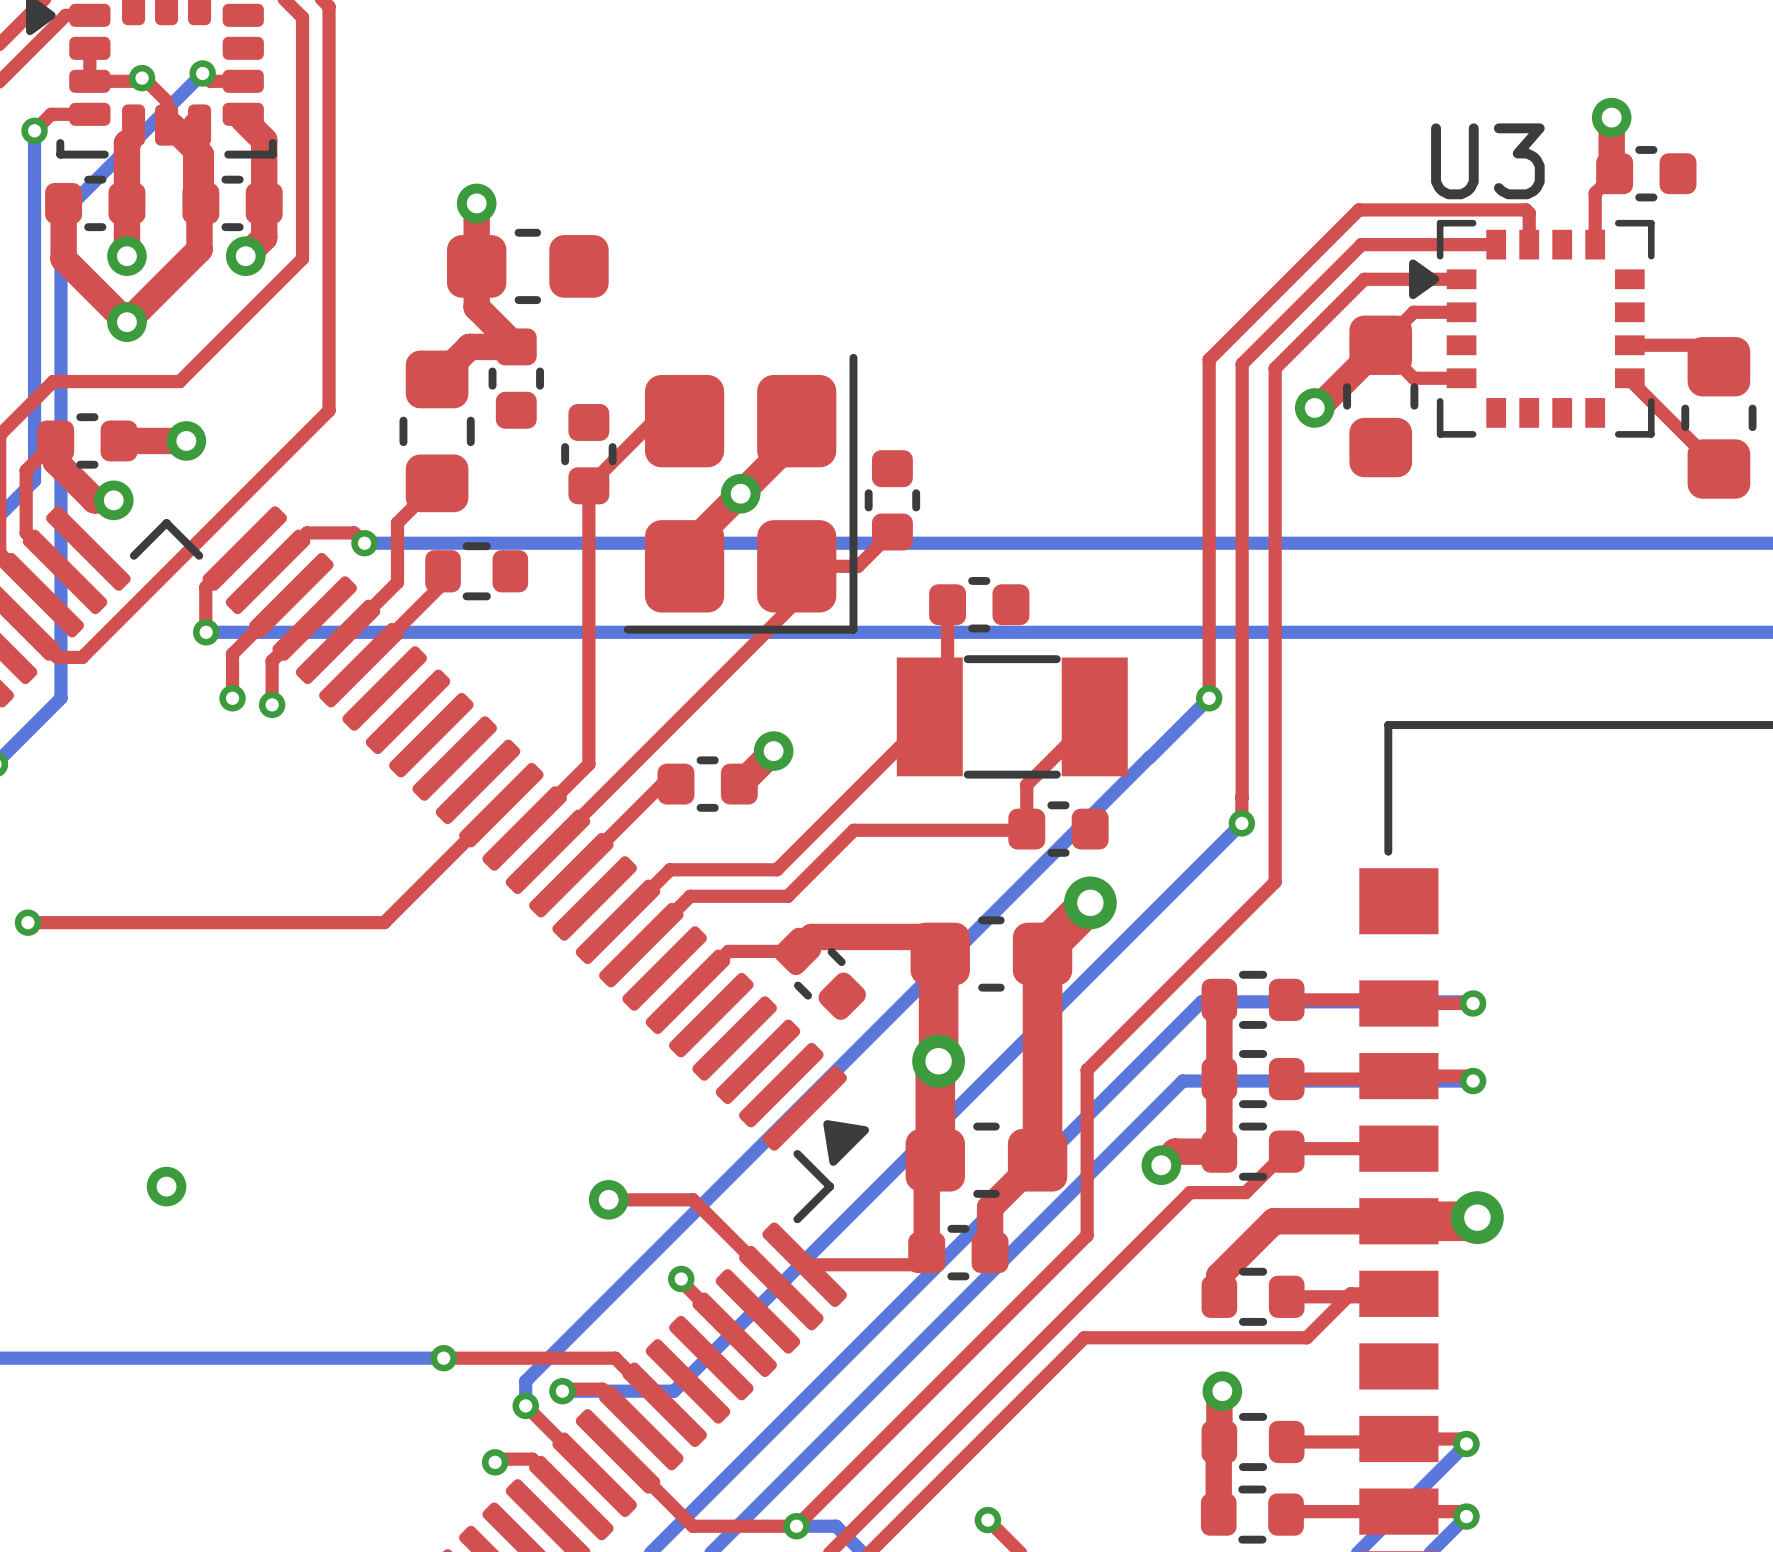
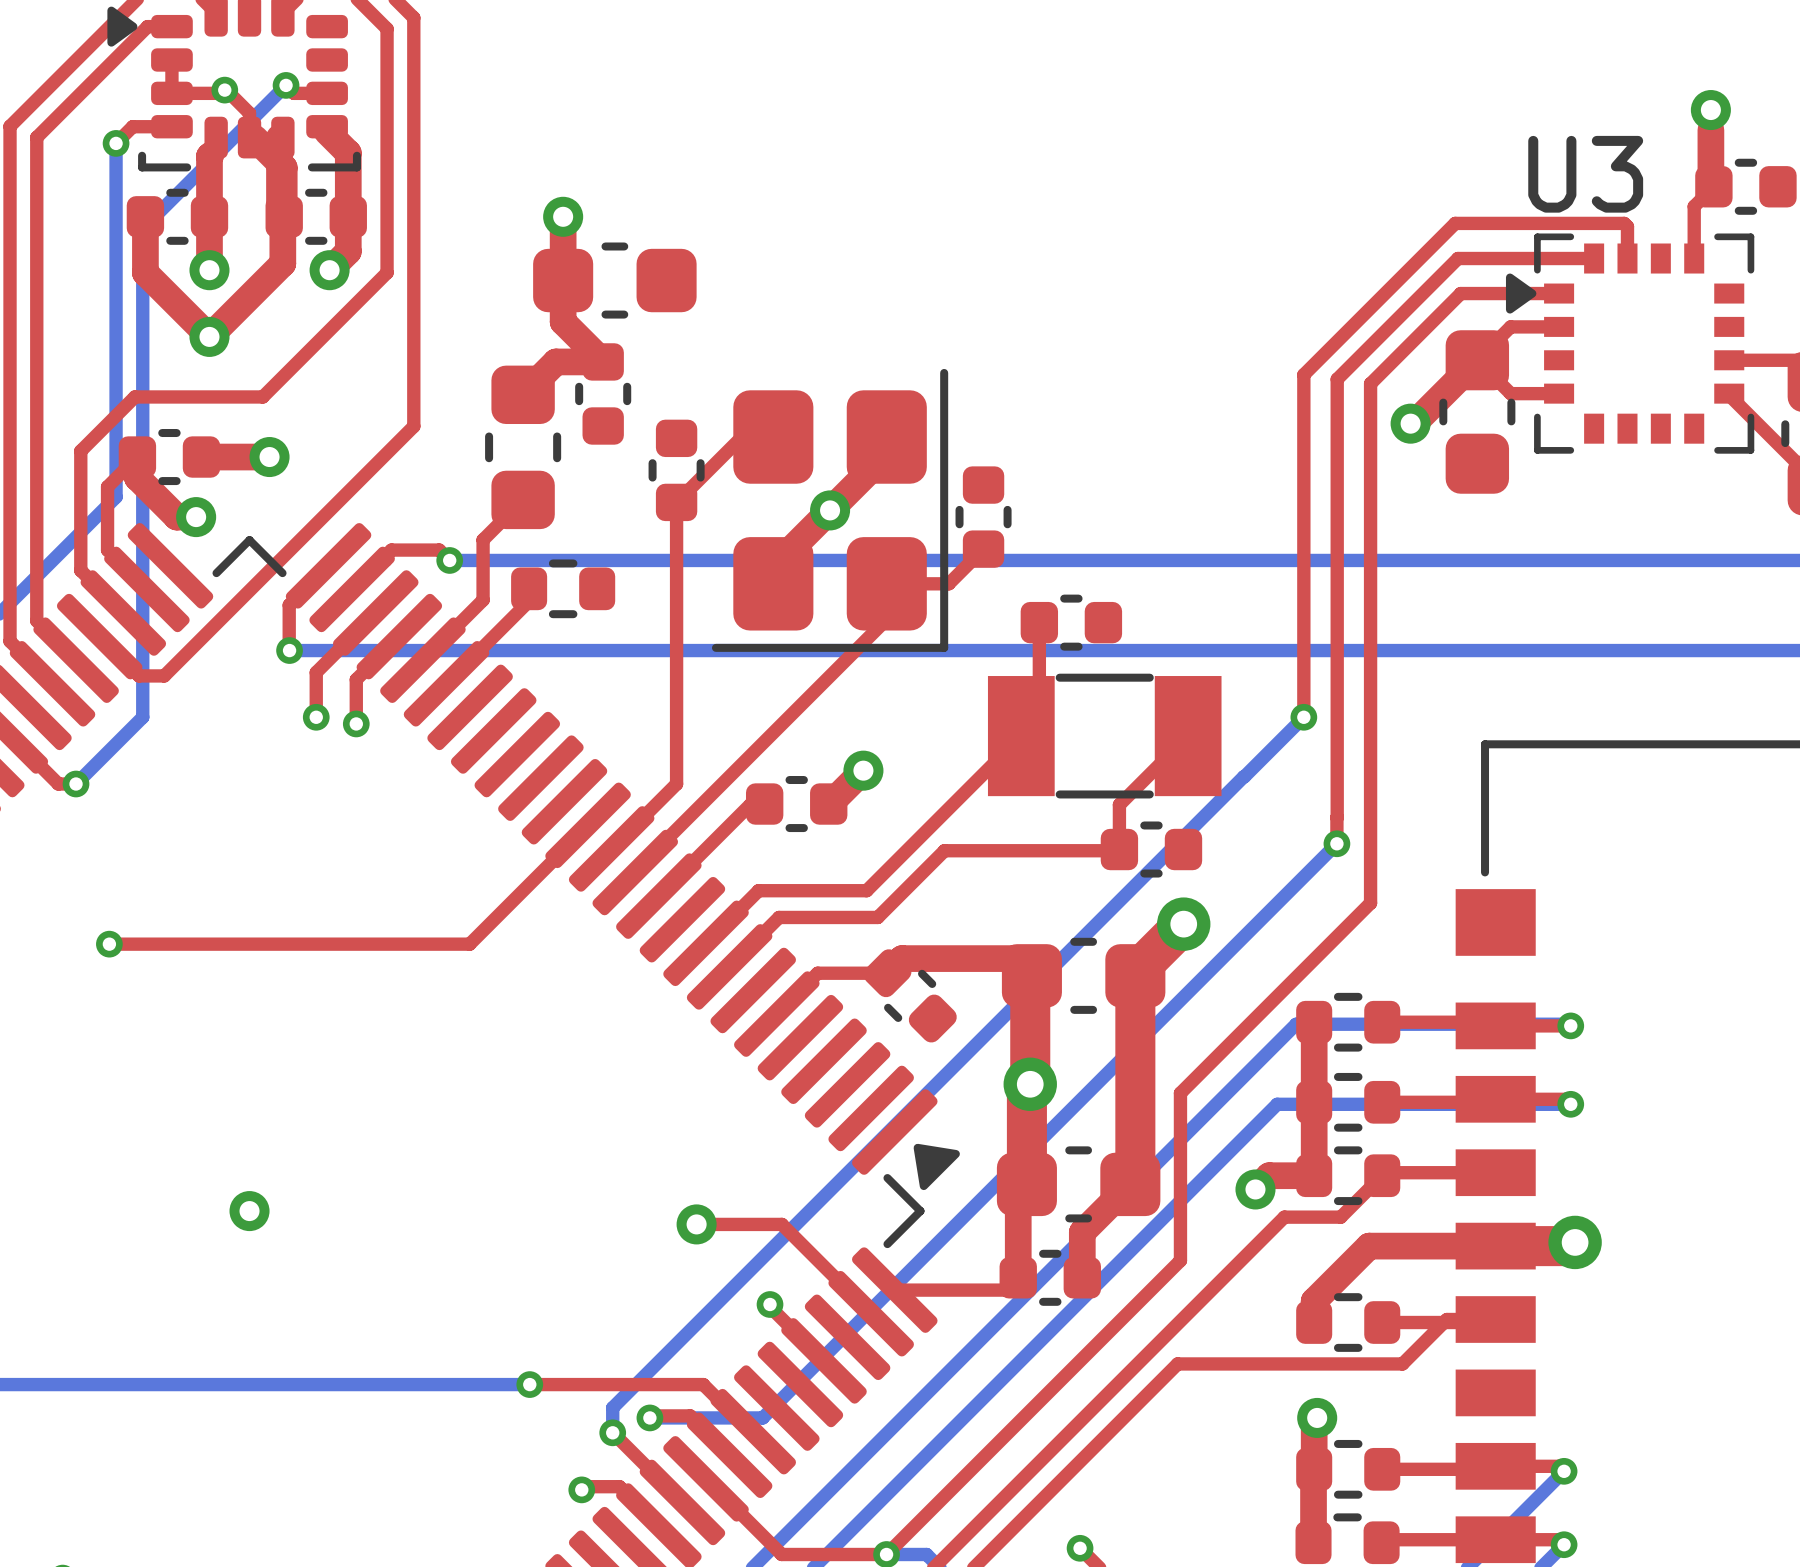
via position: (1611, 117) -> (1710, 110)

